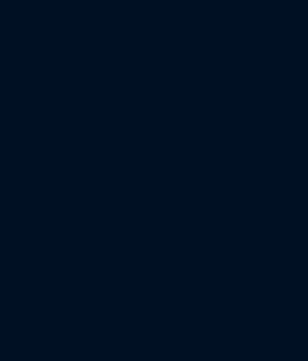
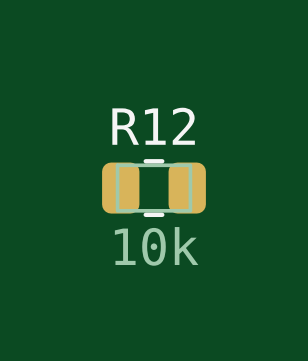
R12: none -> 10k (153, 188)

